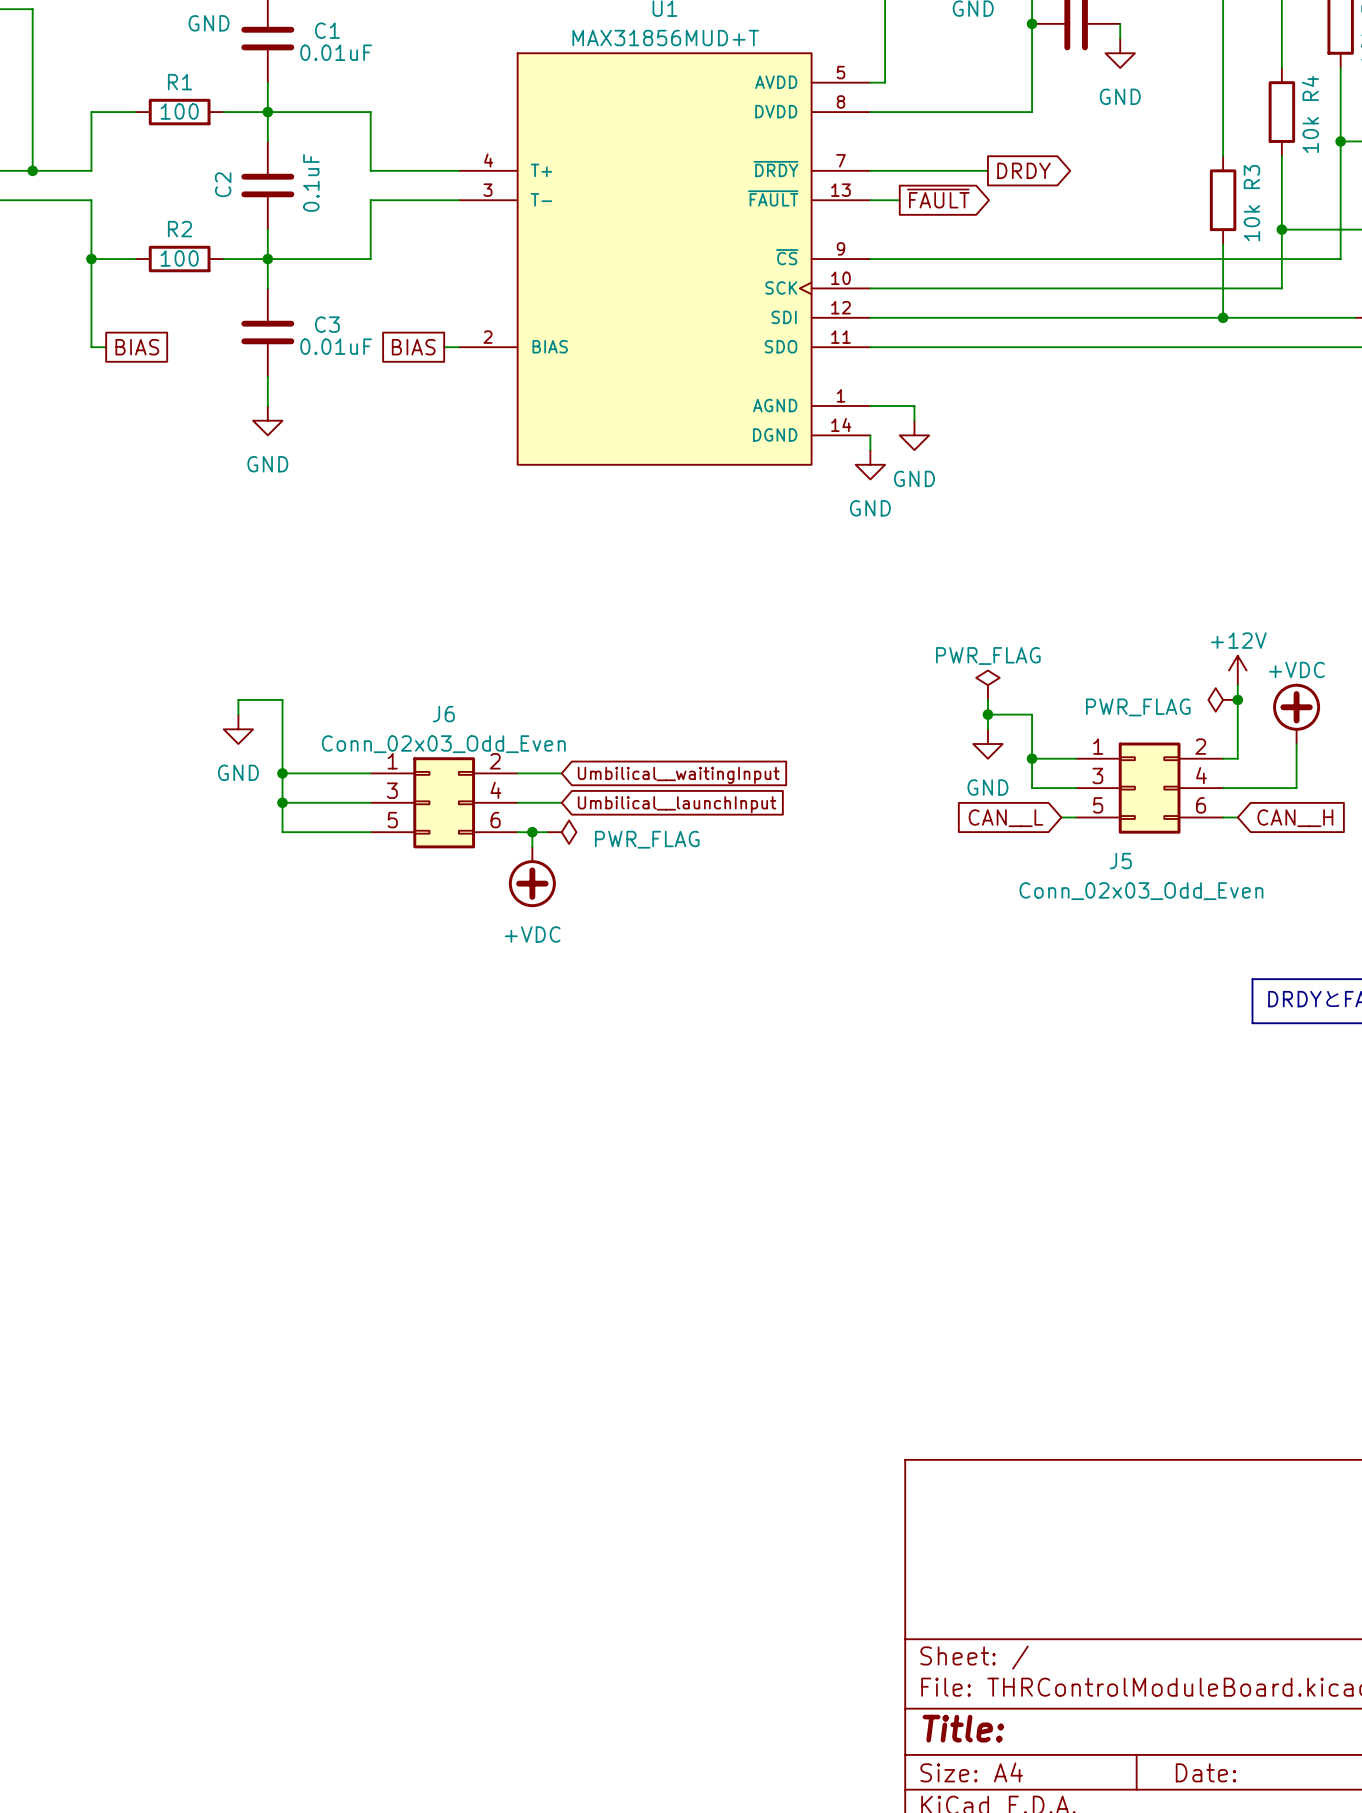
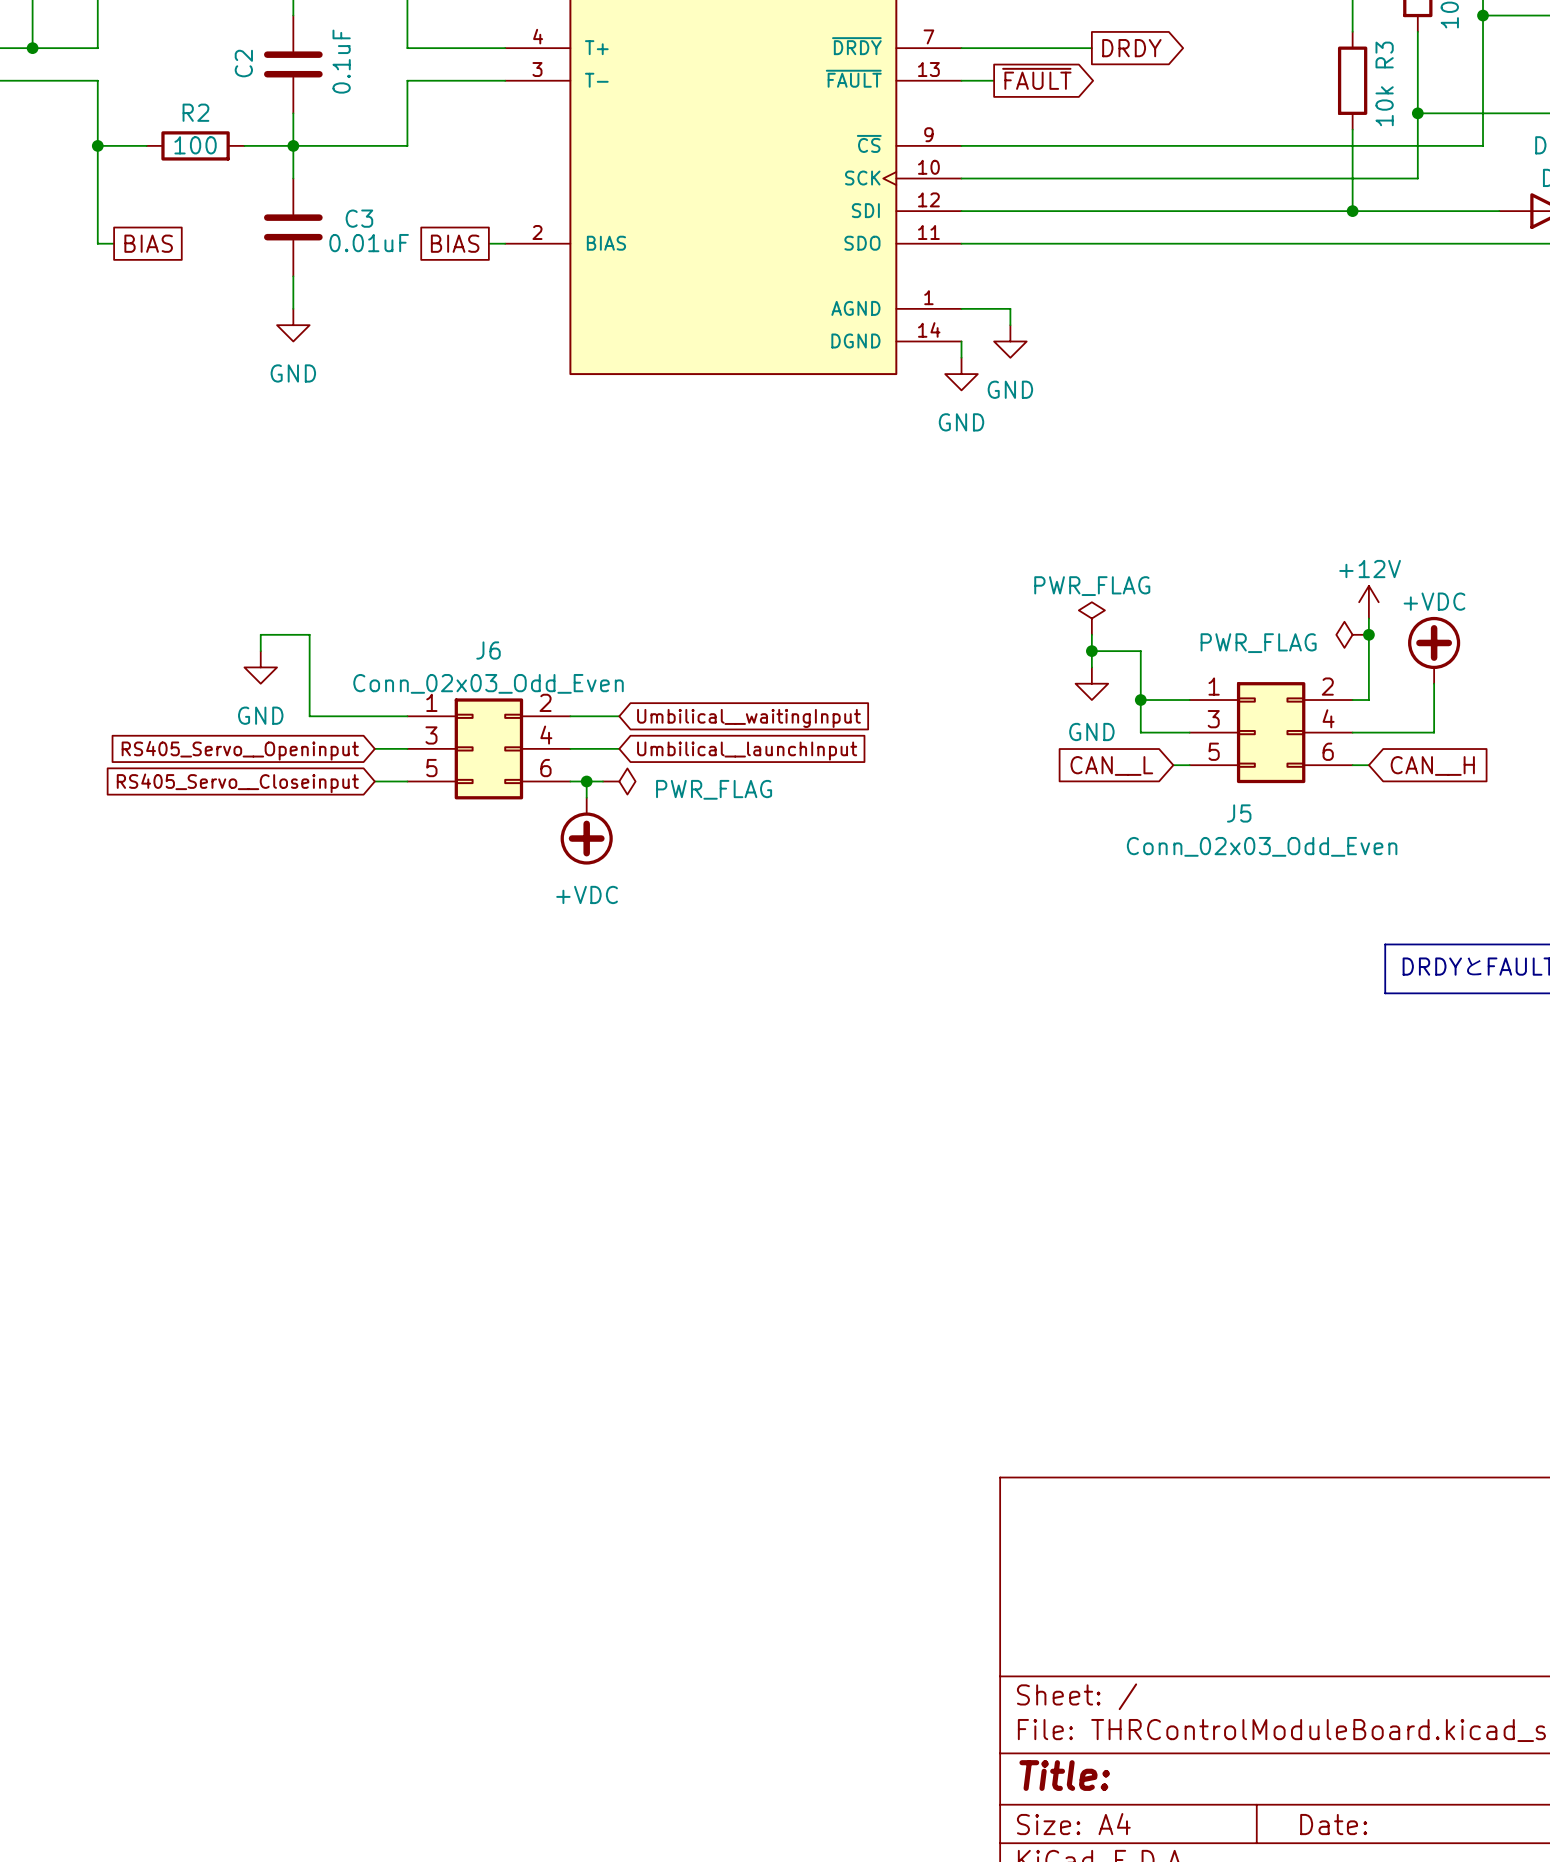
wire: (282, 773) (282, 832) (341, 832) -> none
junction: (282, 773) -> none
wire: (282, 802) (341, 802) -> none
junction: (282, 802) -> none
global label: none -> RS405_Servo__Openinput (240, 750)
global label: none -> RS405_Servo__Closeinput (237, 783)

